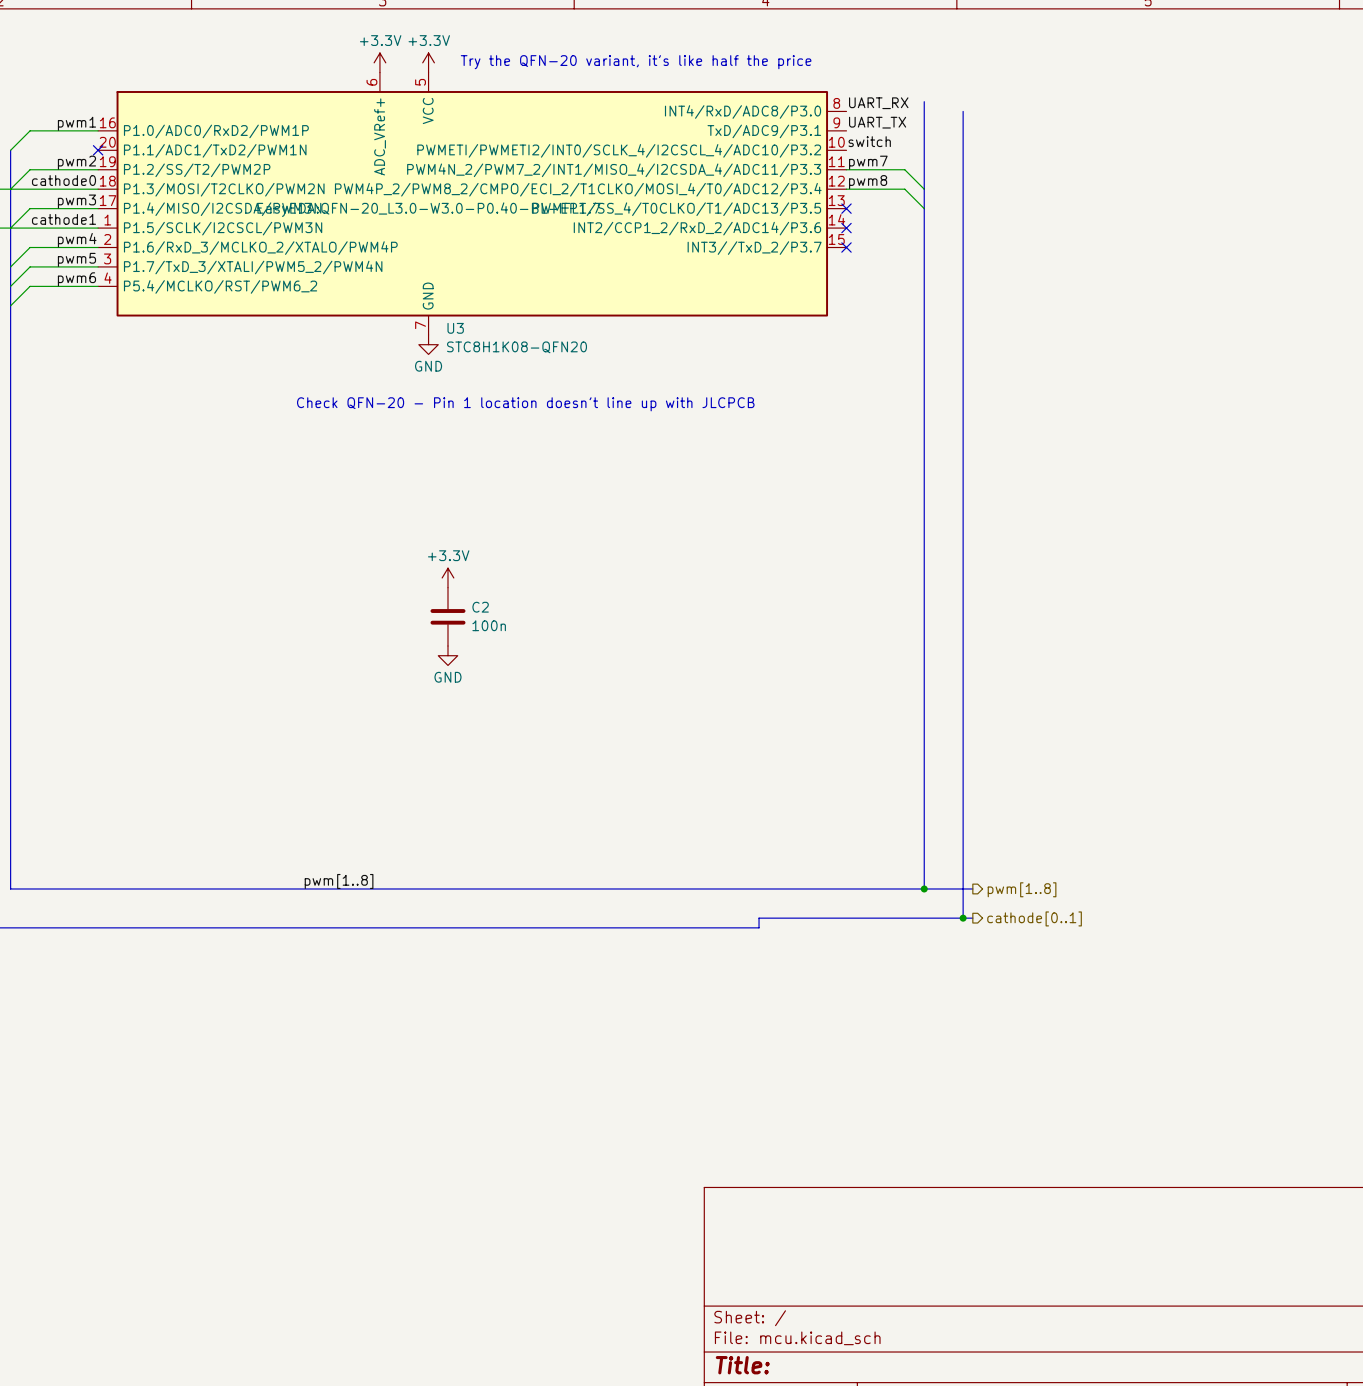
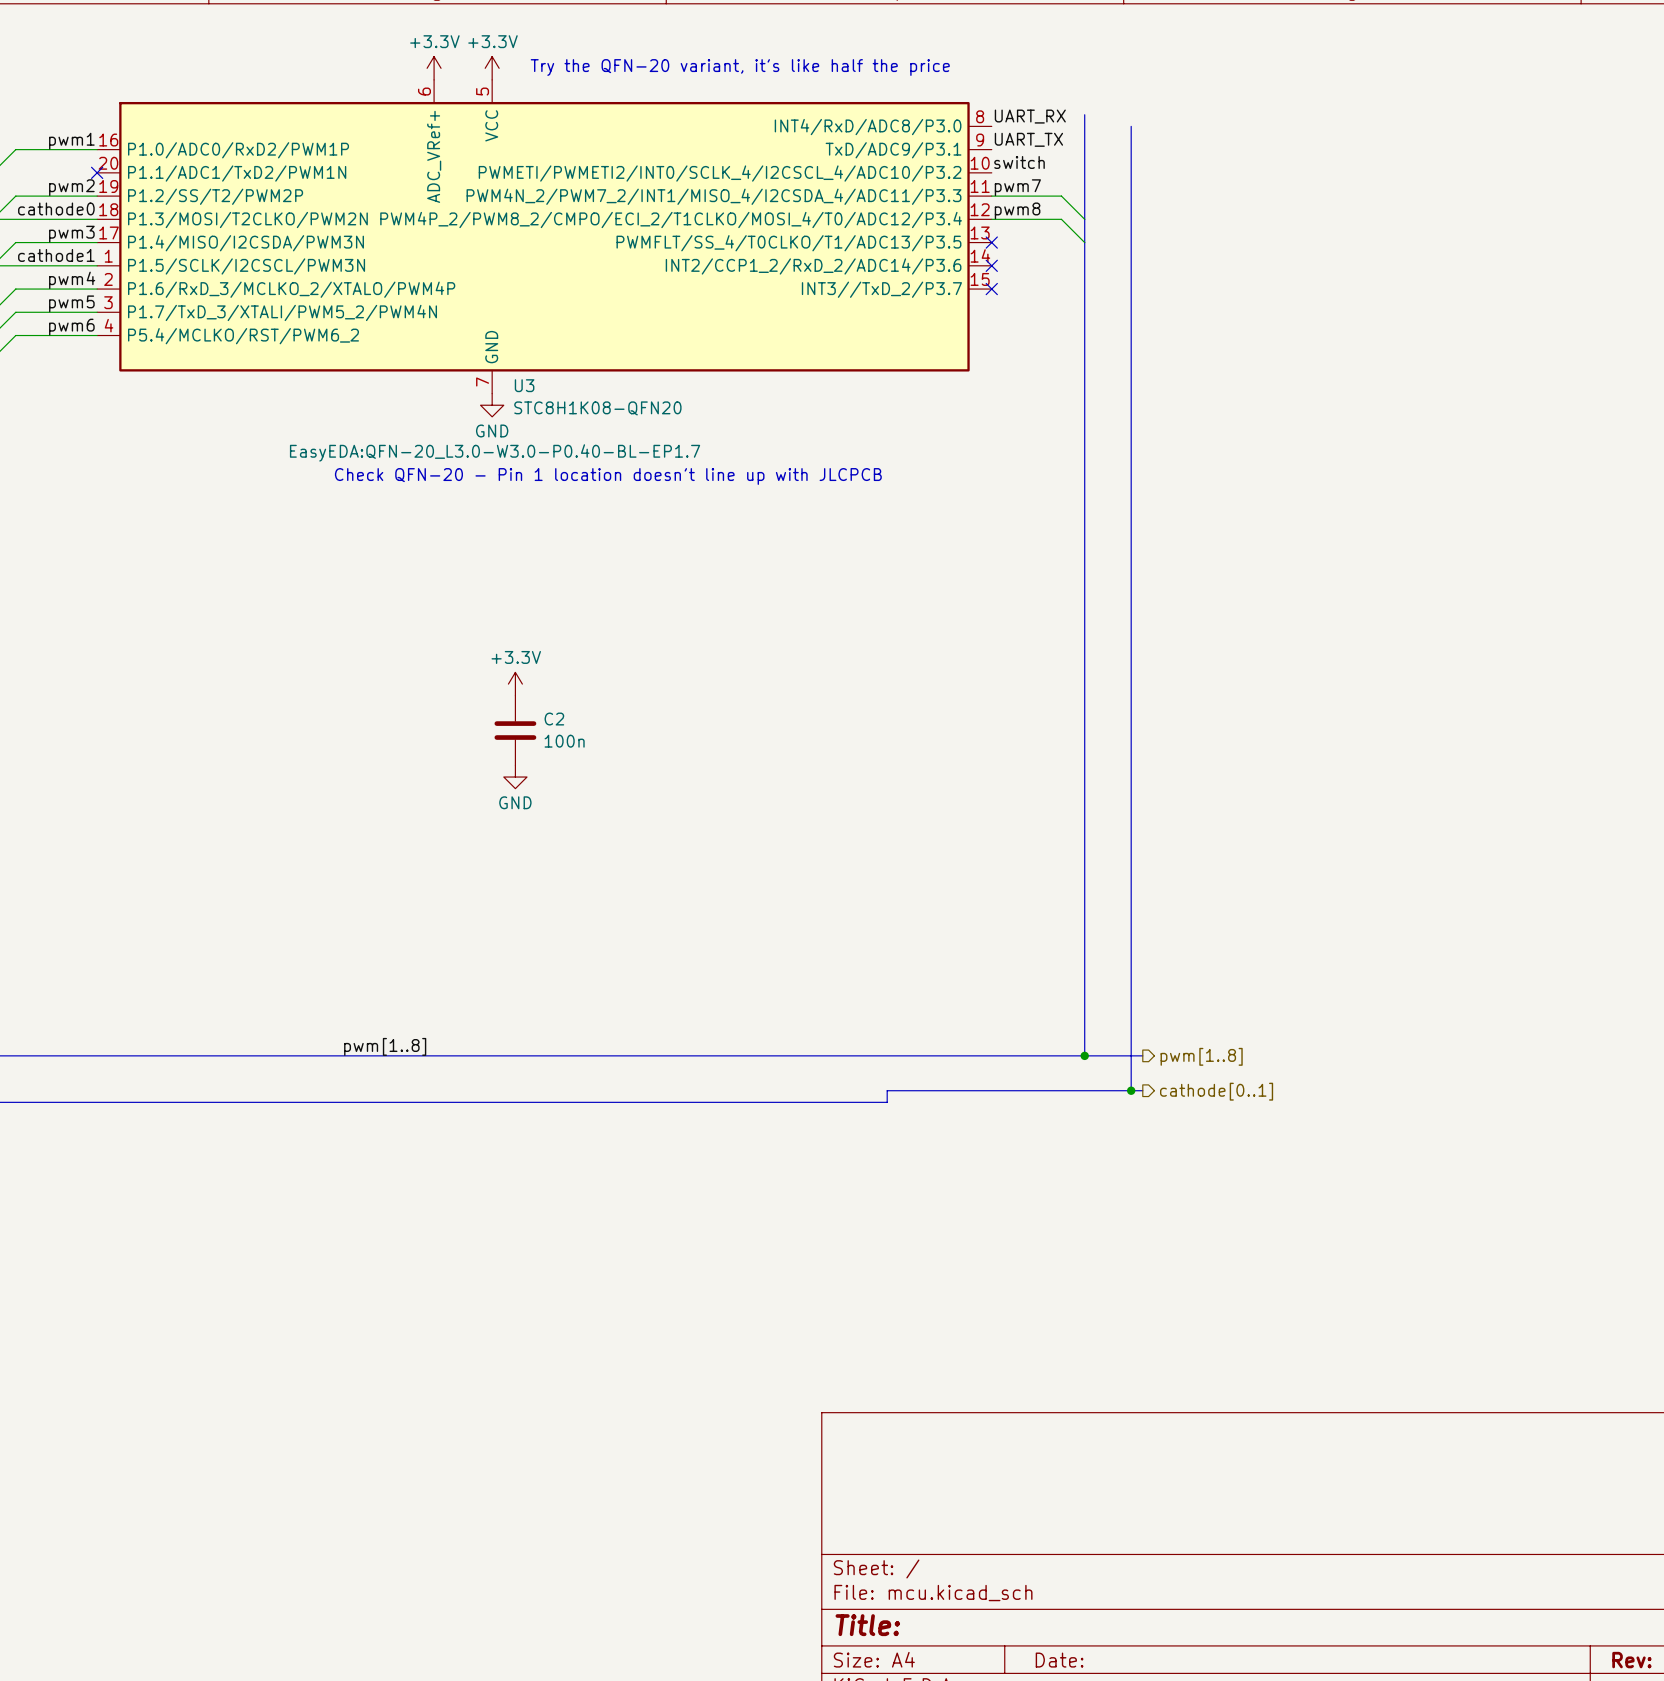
U3 text position: EasyEDA:QFN-20_L3.0-W3.0-P0.40-BL-EP1.7 (429, 209) -> EasyEDA:QFN-20_L3.0-W3.0-P0.40-BL-EP1.7 (495, 452)

